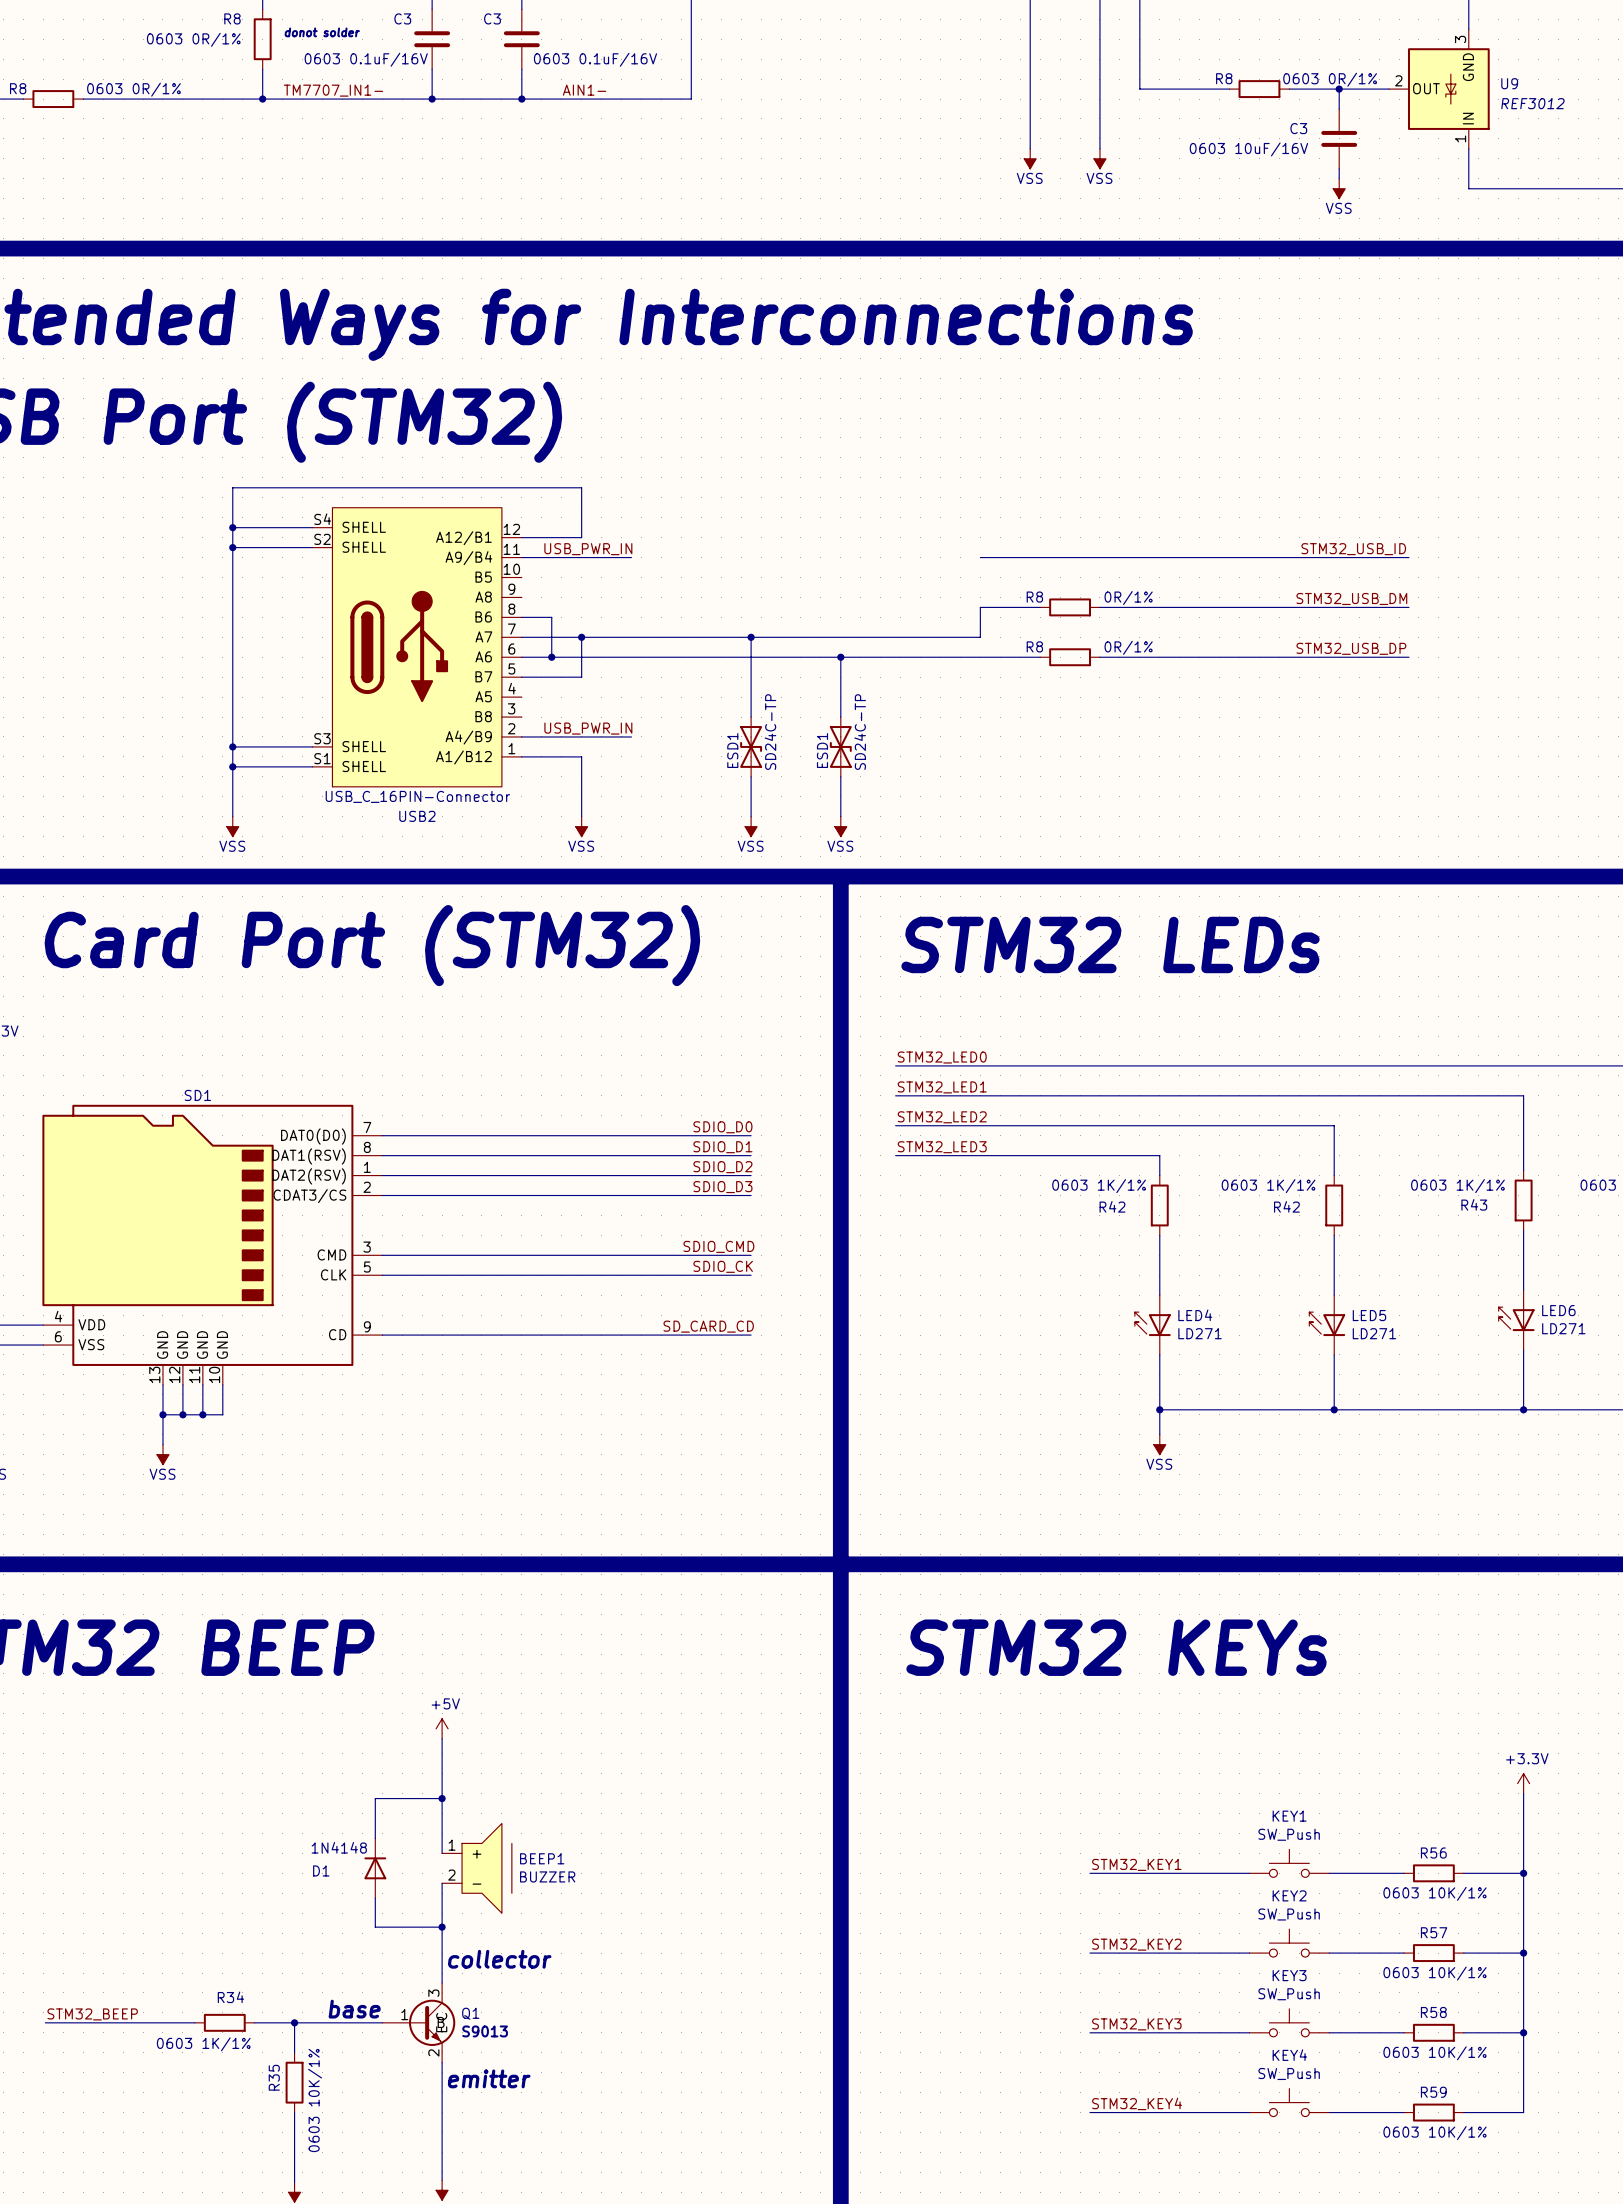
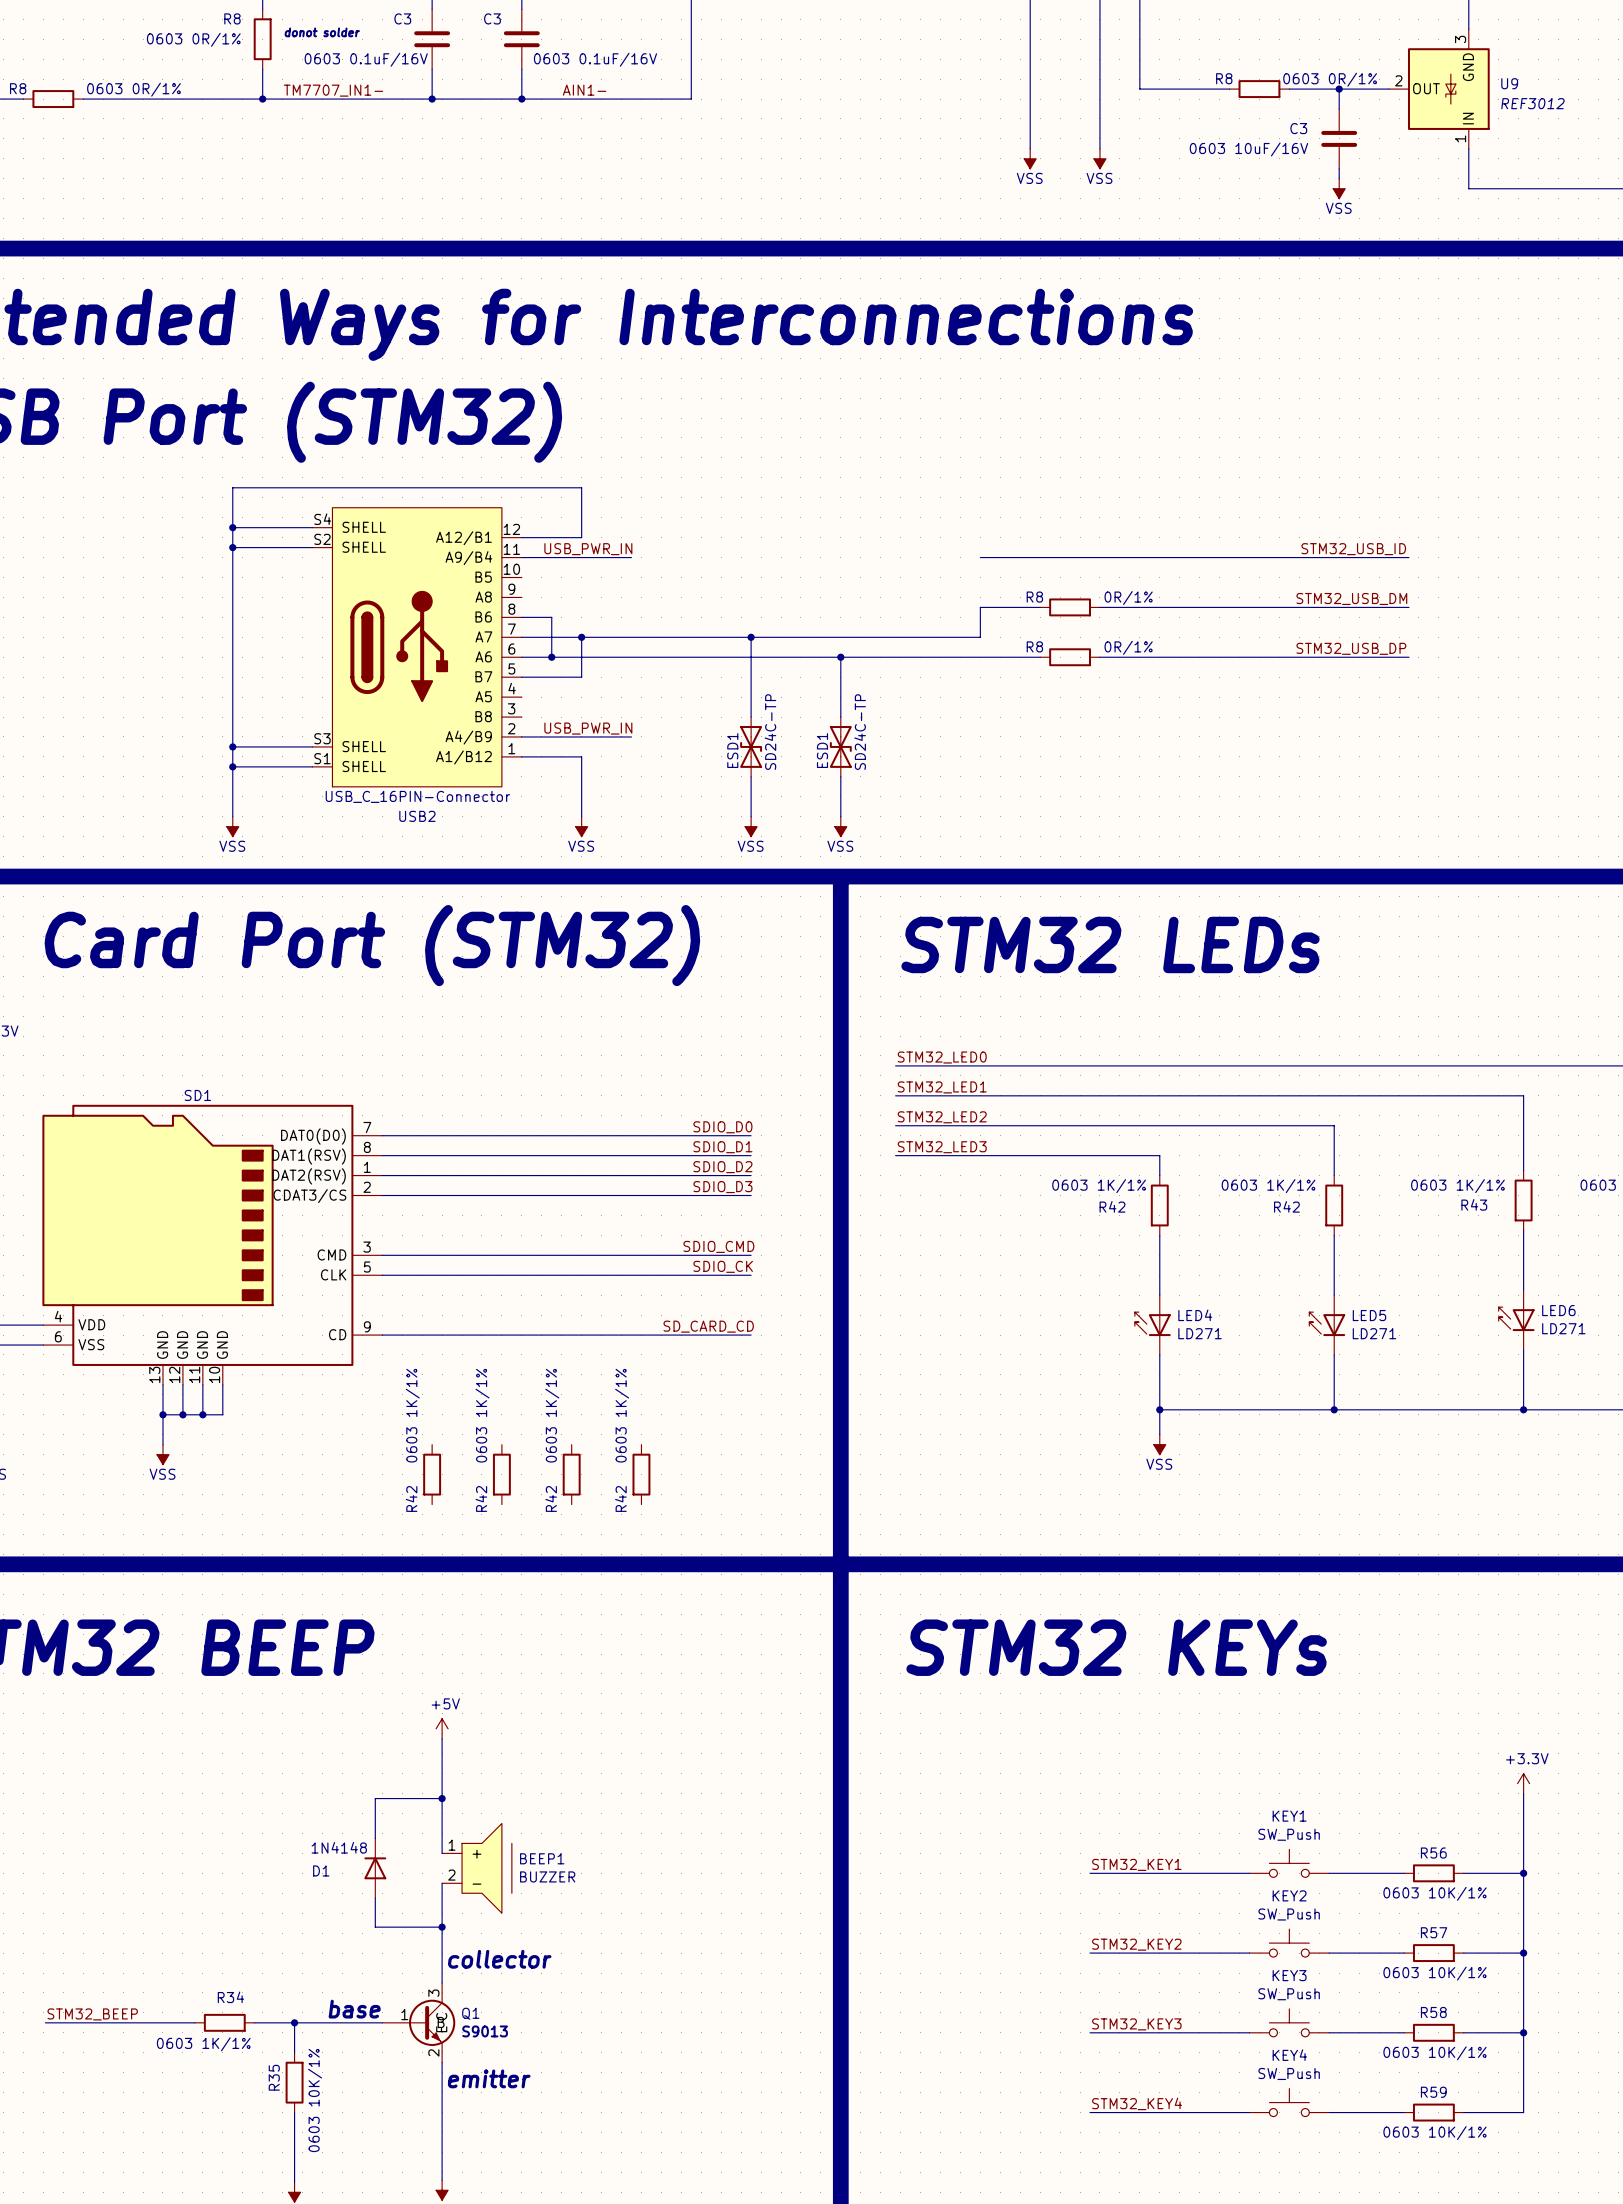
R42: none -> 0603 1K/1% (432, 1474)
R42: none -> 0603 1K/1% (501, 1474)
R42: none -> 0603 1K/1% (571, 1474)
R42: none -> 0603 1K/1% (641, 1474)

